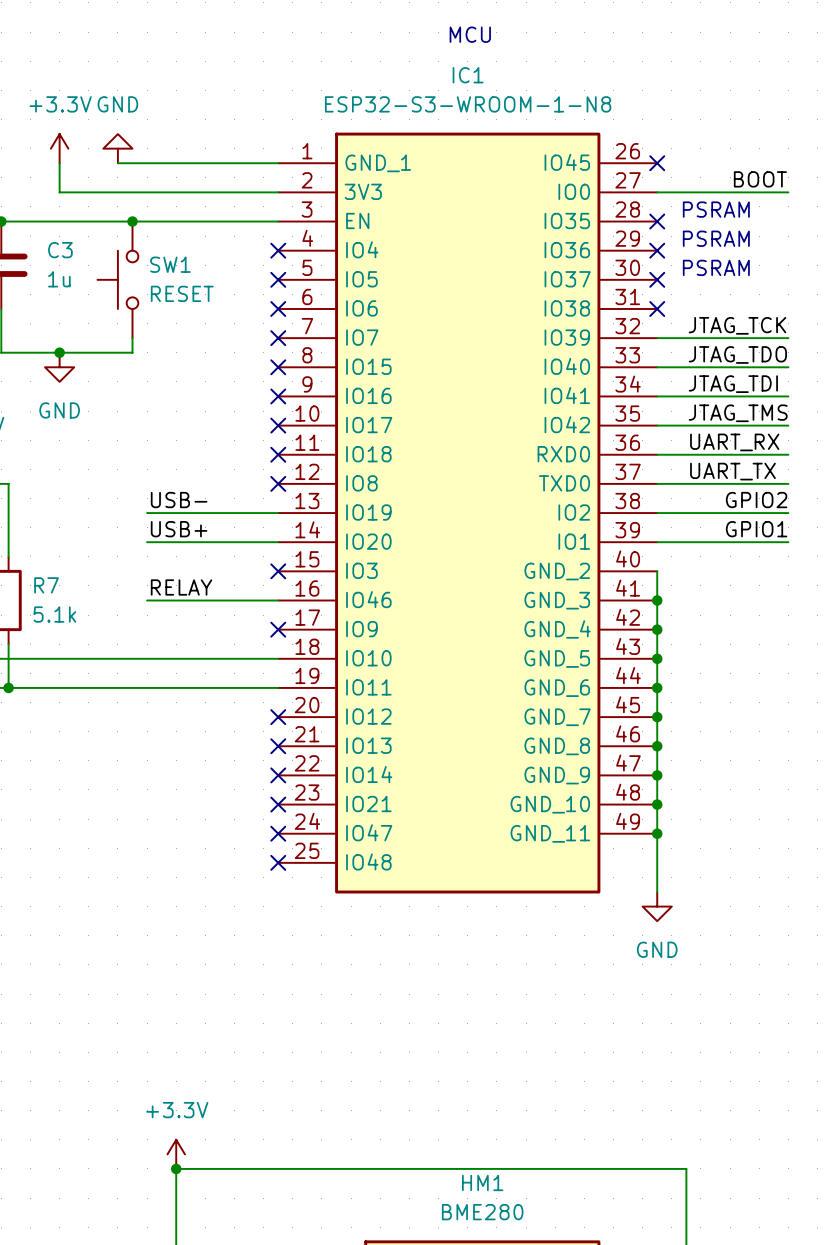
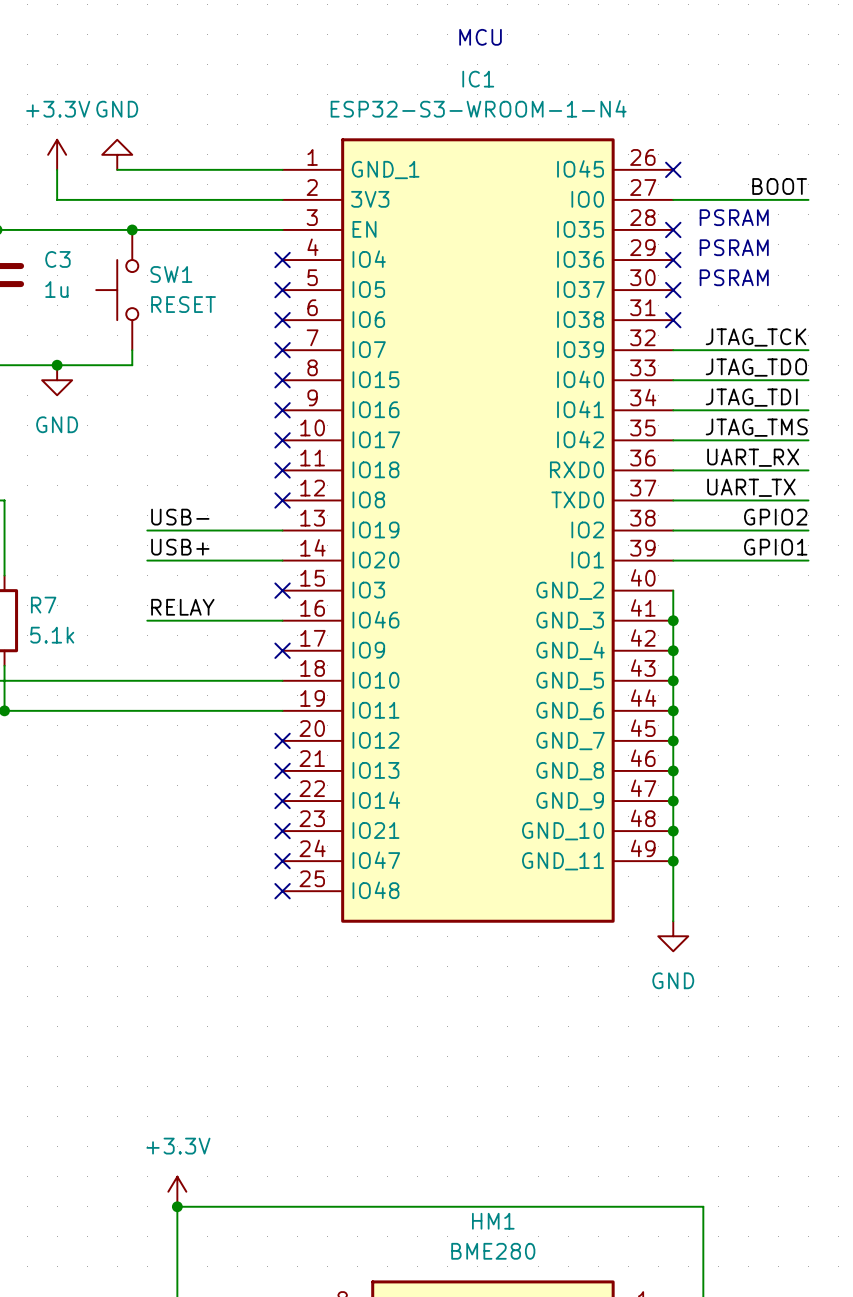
IC1 value: ESP32-S3-WROOM-1-N8 (468, 104) -> ESP32-S3-WROOM-1-N4 (478, 108)

